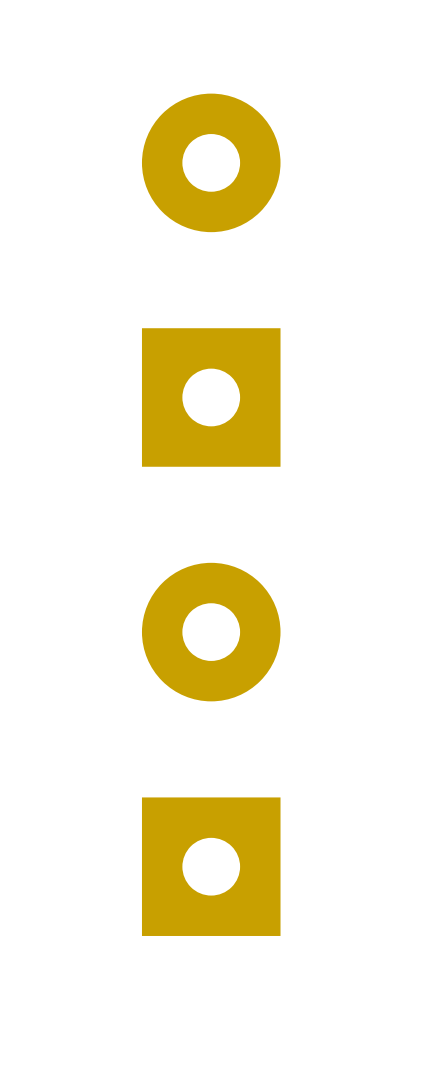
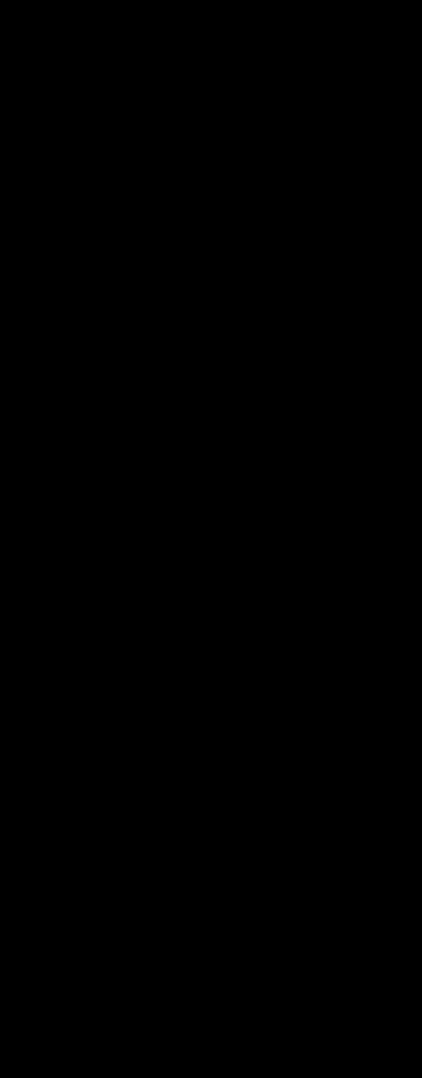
part: (211, 280) -> none
part: (211, 749) -> none

